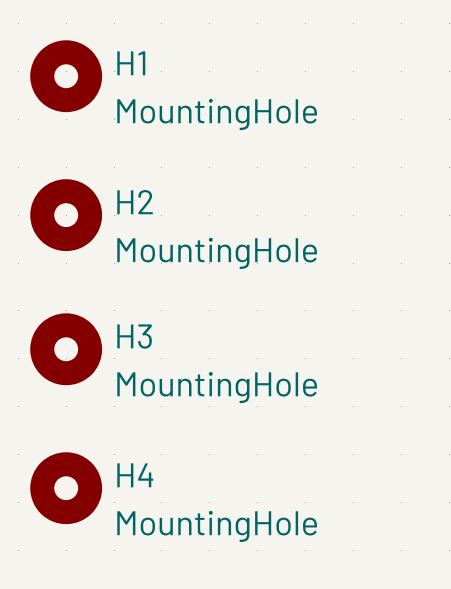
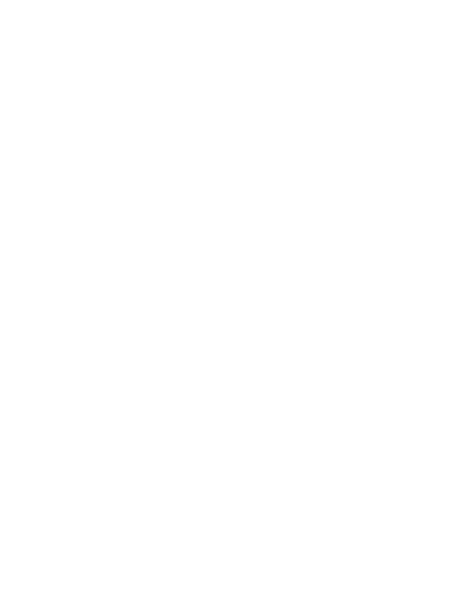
H1: MountingHole (66, 76) -> none
H2: MountingHole (66, 215) -> none
H3: MountingHole (66, 349) -> none
H4: MountingHole (66, 488) -> none

